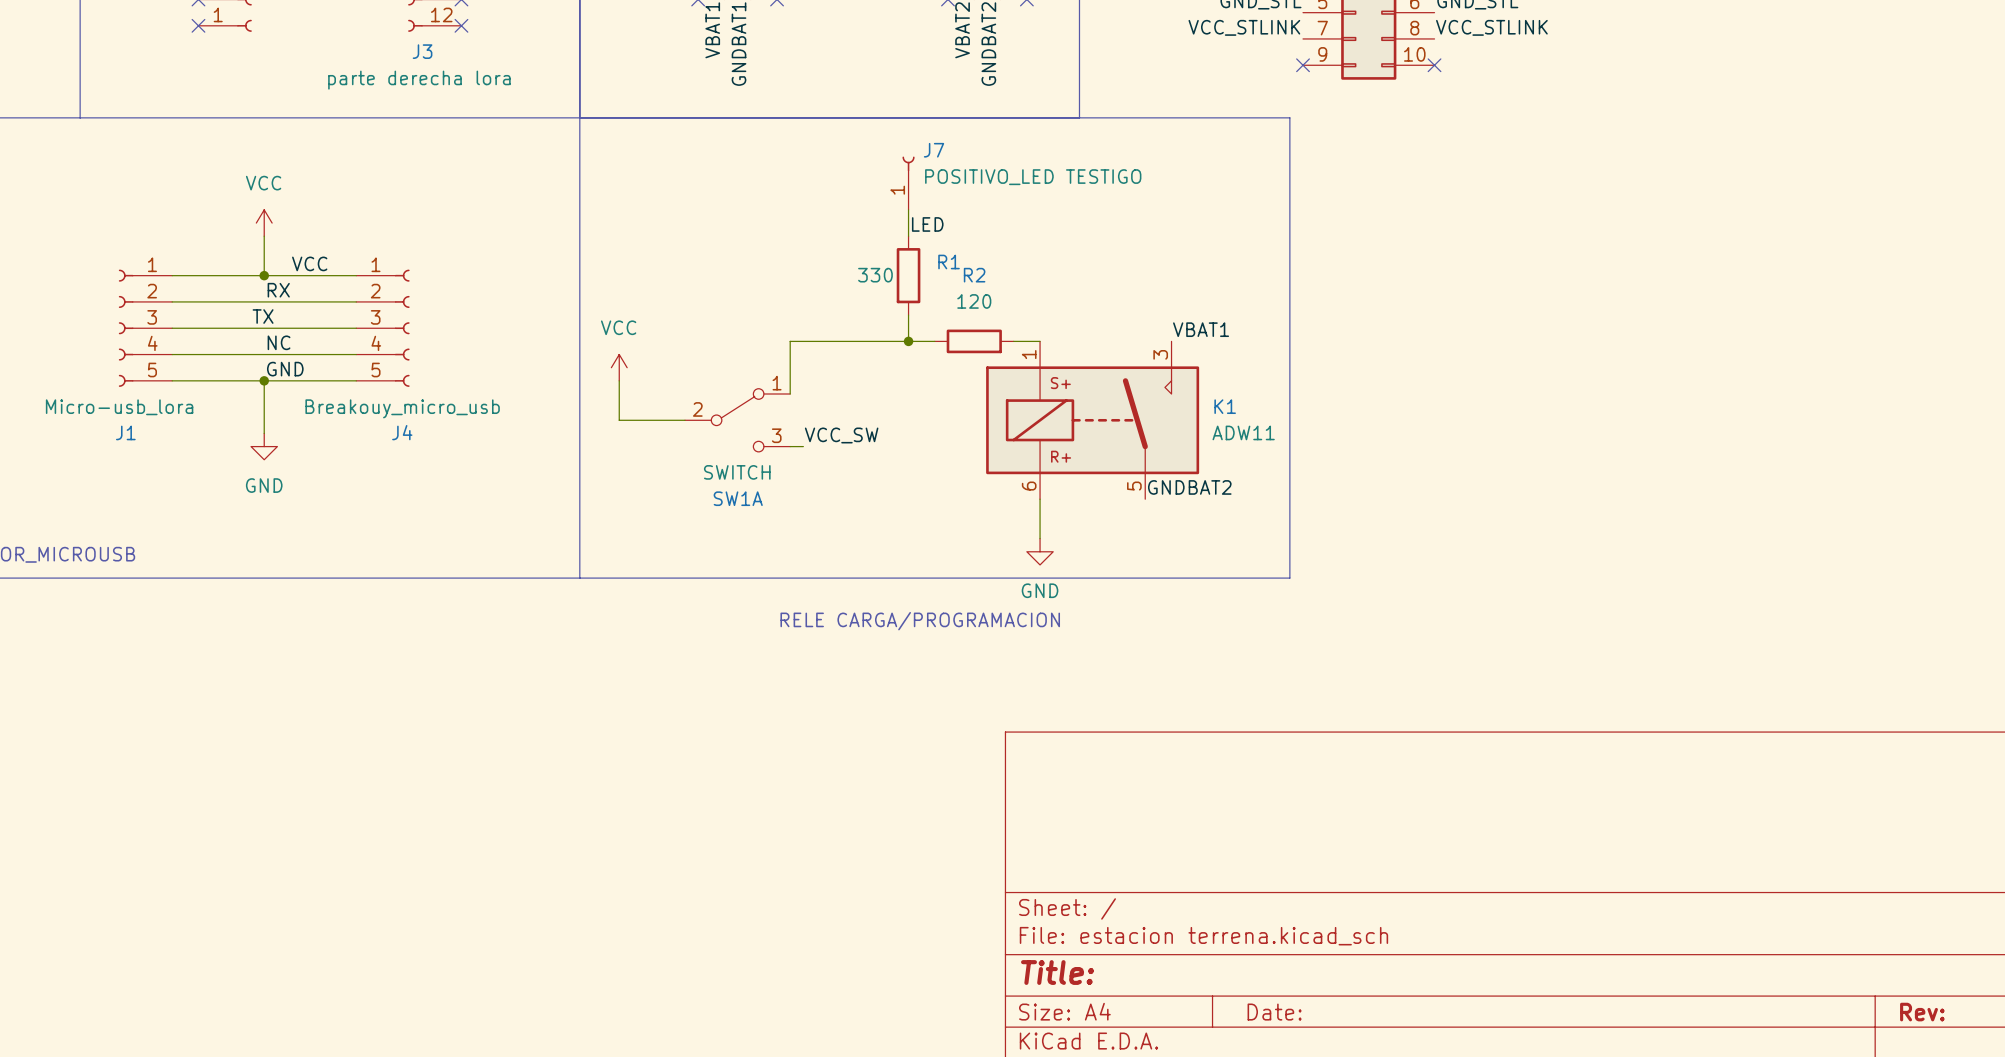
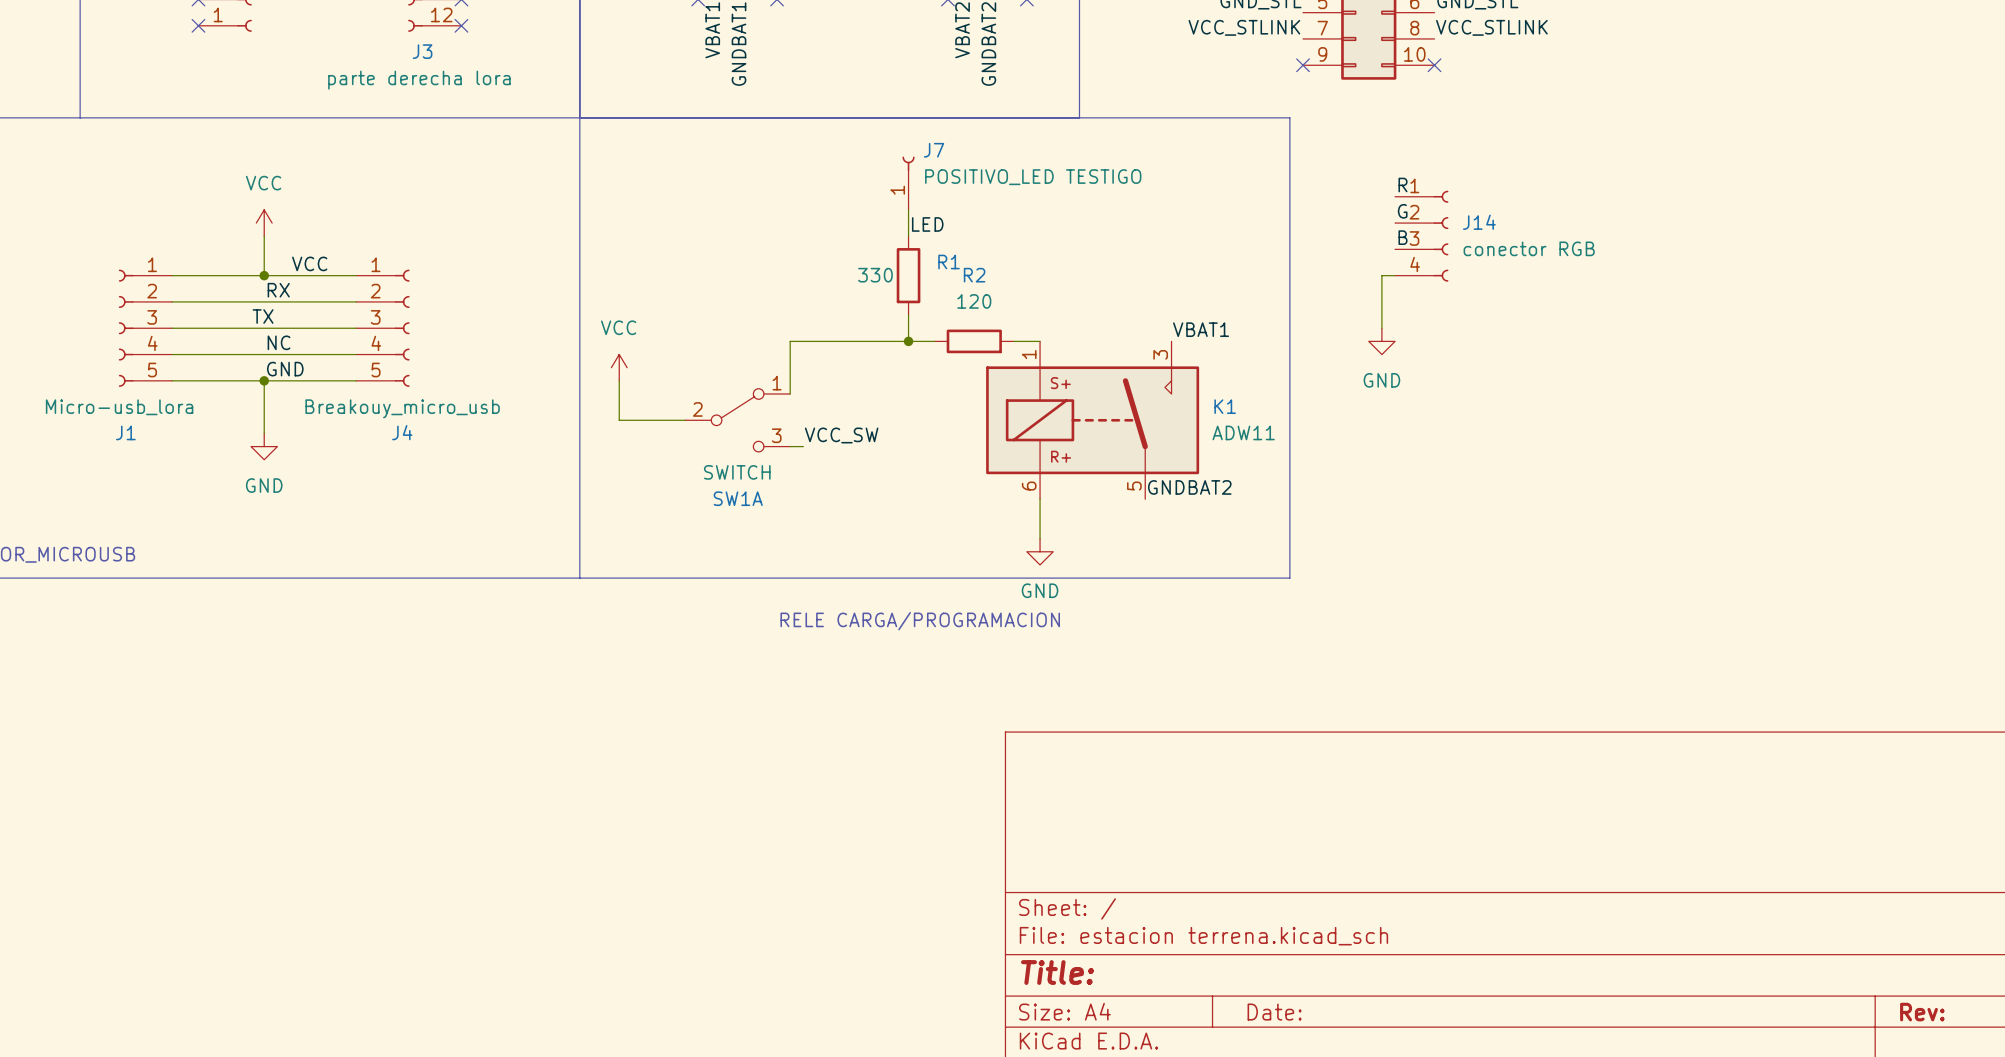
label: none -> R (1402, 185)
label: none -> G (1402, 211)
J14: none -> conector RGB (1421, 236)
label: none -> B (1402, 237)
wire: none -> (1395, 275) (1381, 275) (1381, 328)
power symbol: none -> GND (1381, 341)

